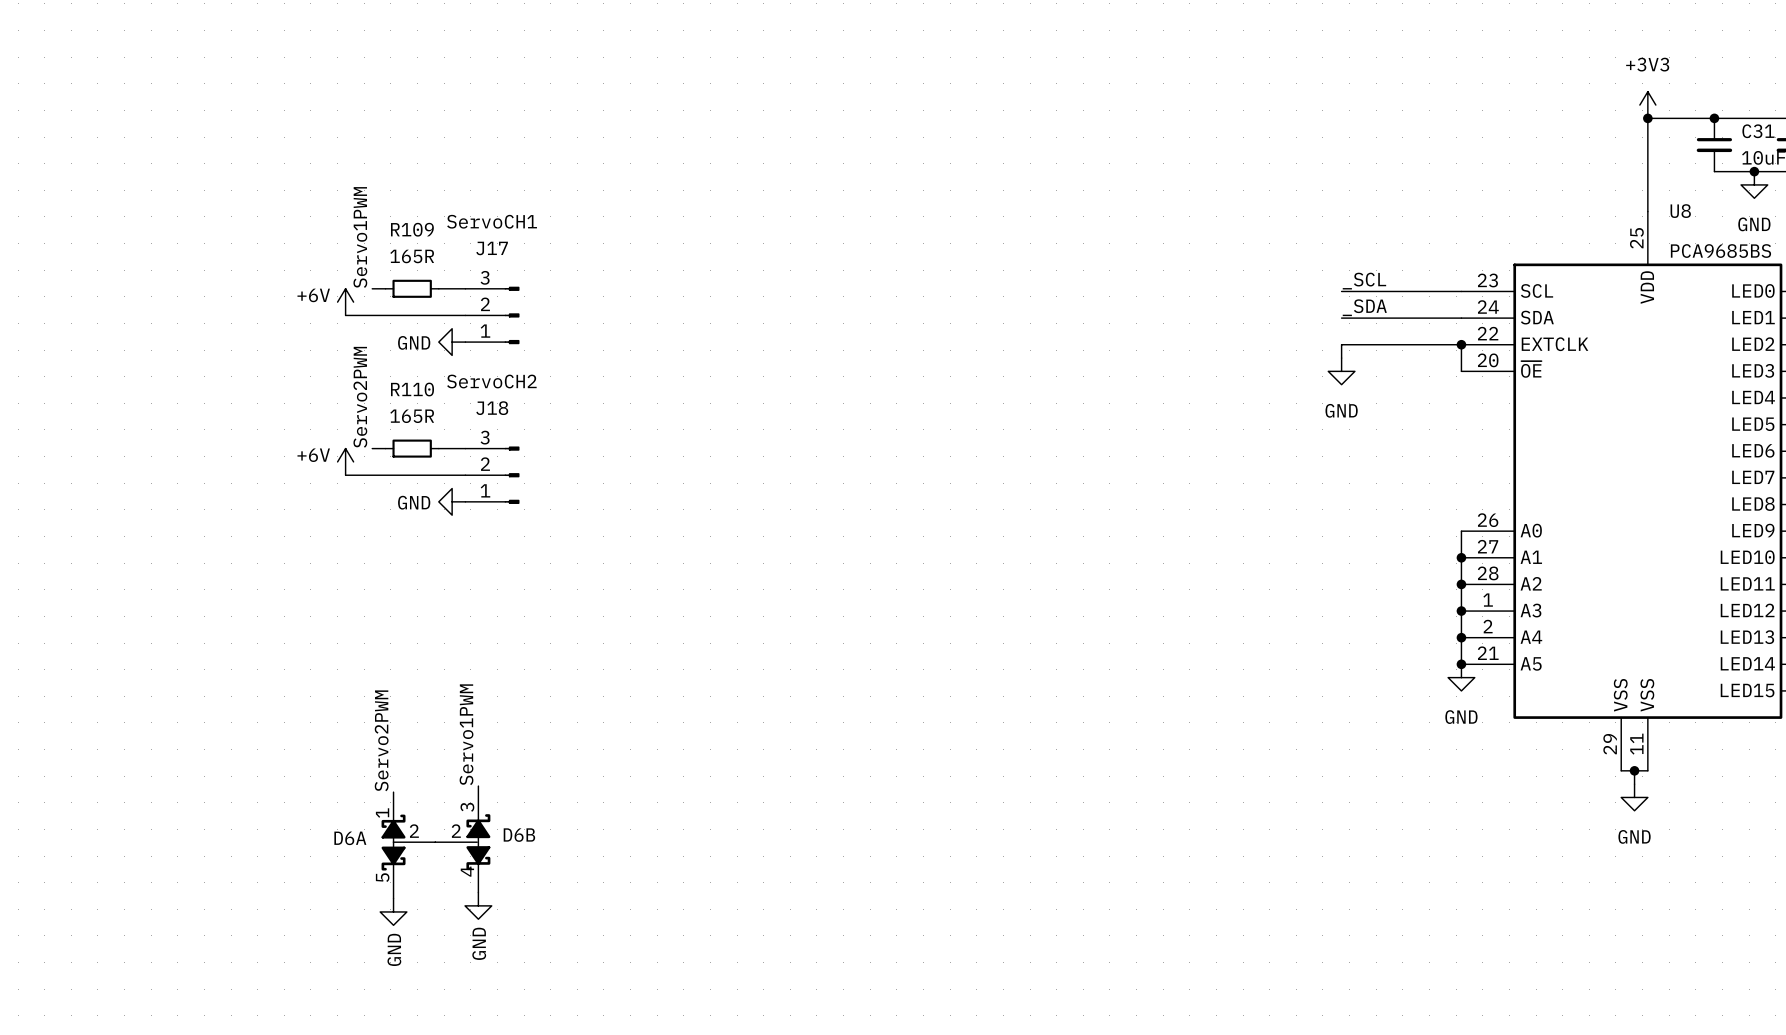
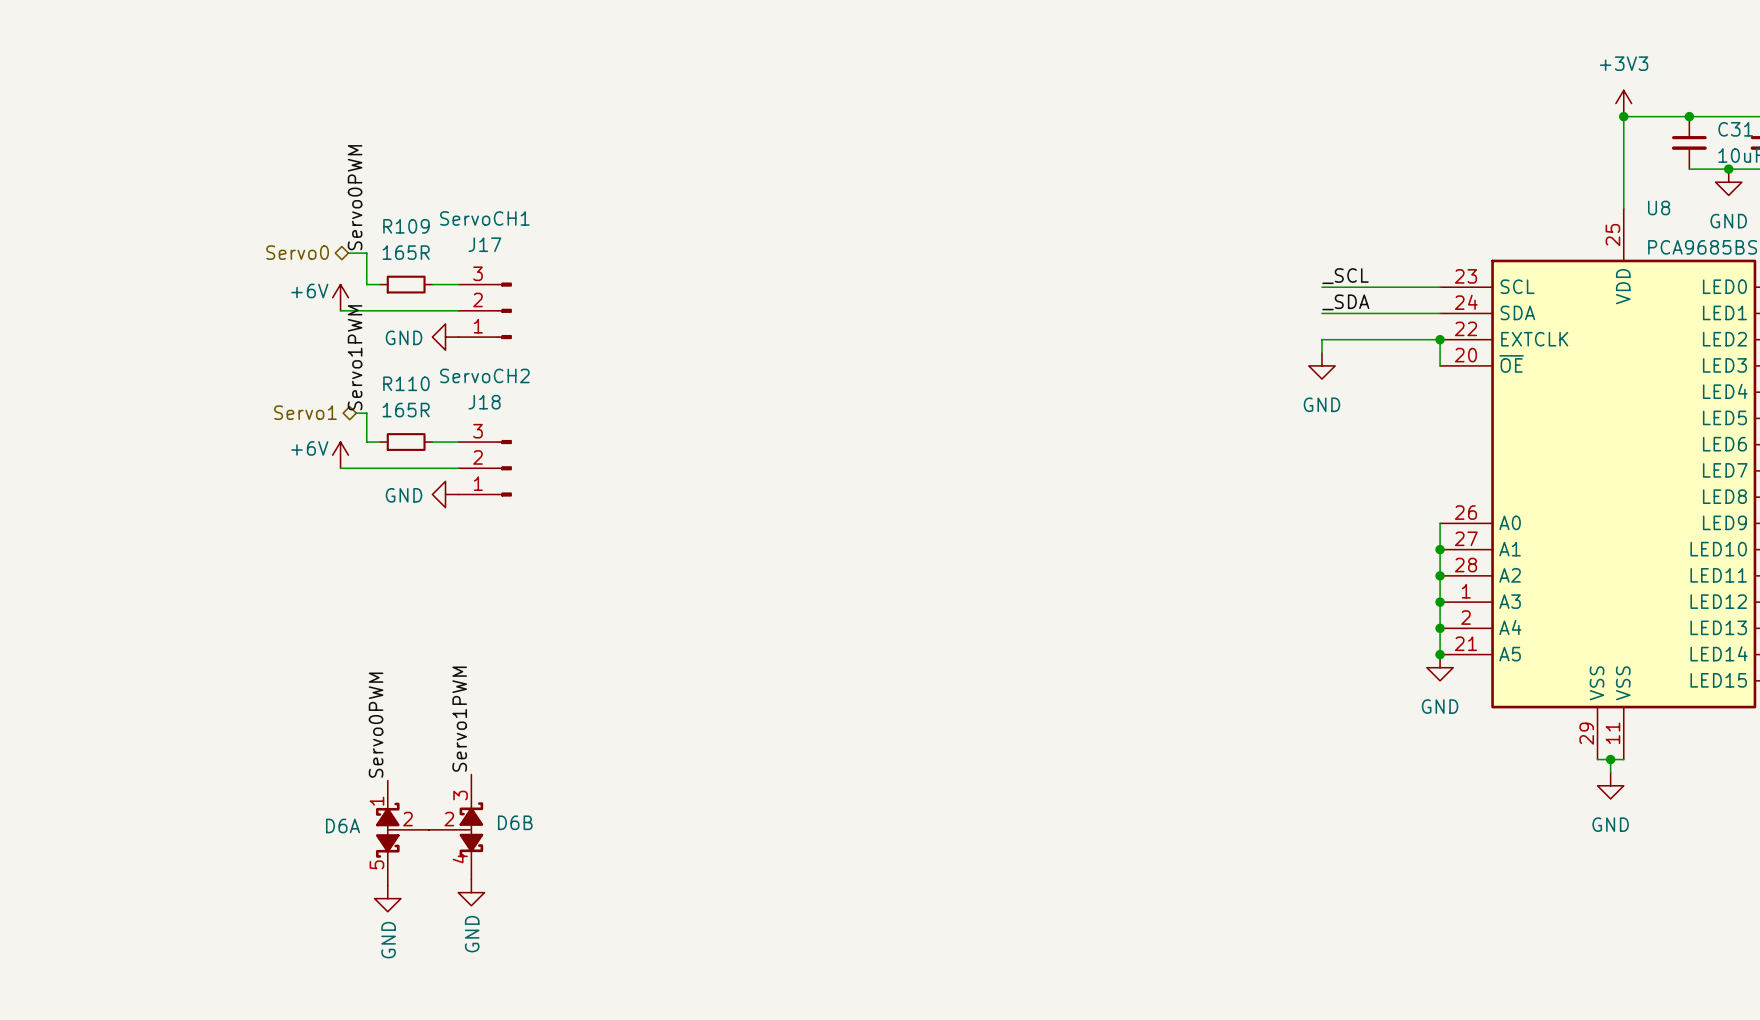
label: none -> Servo0PWM (355, 197)
label position: Servo1PWM (360, 237) -> Servo1PWM (355, 357)
hierarchical label: none -> Servo0 (297, 252)
wire: none -> (348, 253) (366, 253) (366, 284)
label: Servo2PWM (360, 397) -> none
hierarchical label: none -> Servo1 (305, 412)
wire: none -> (356, 413) (366, 413) (366, 442)
label: Servo2PWM (381, 740) -> Servo0PWM (376, 725)

